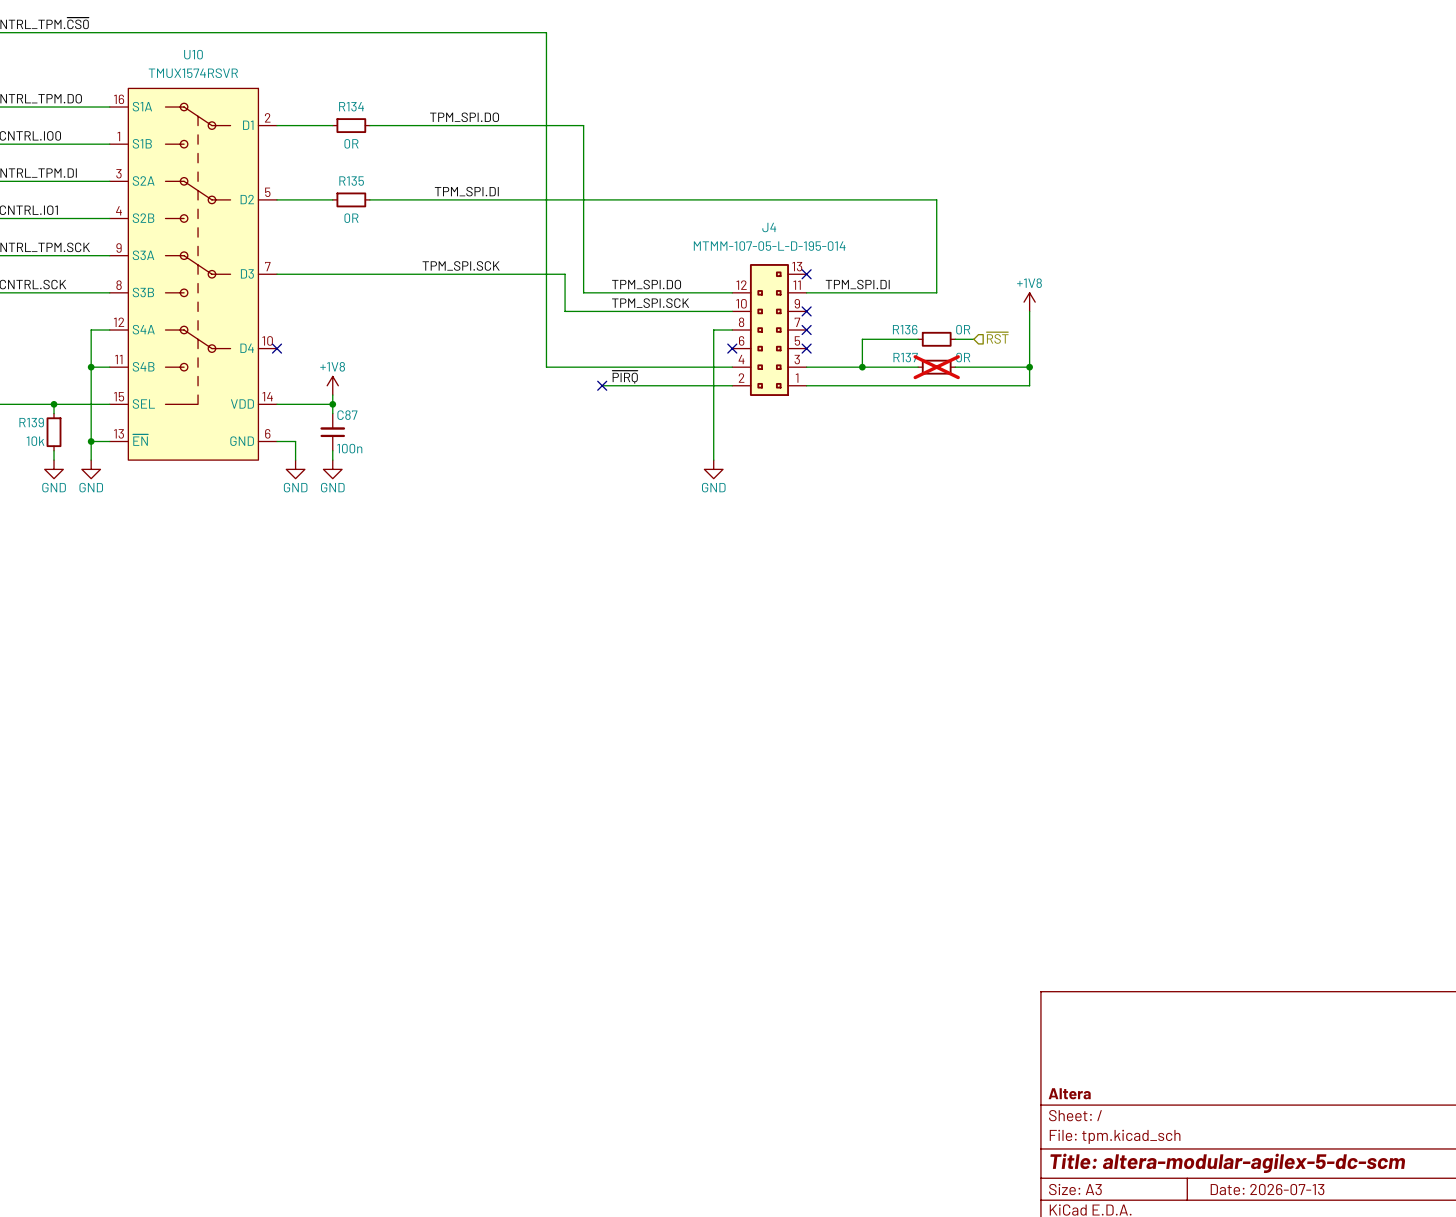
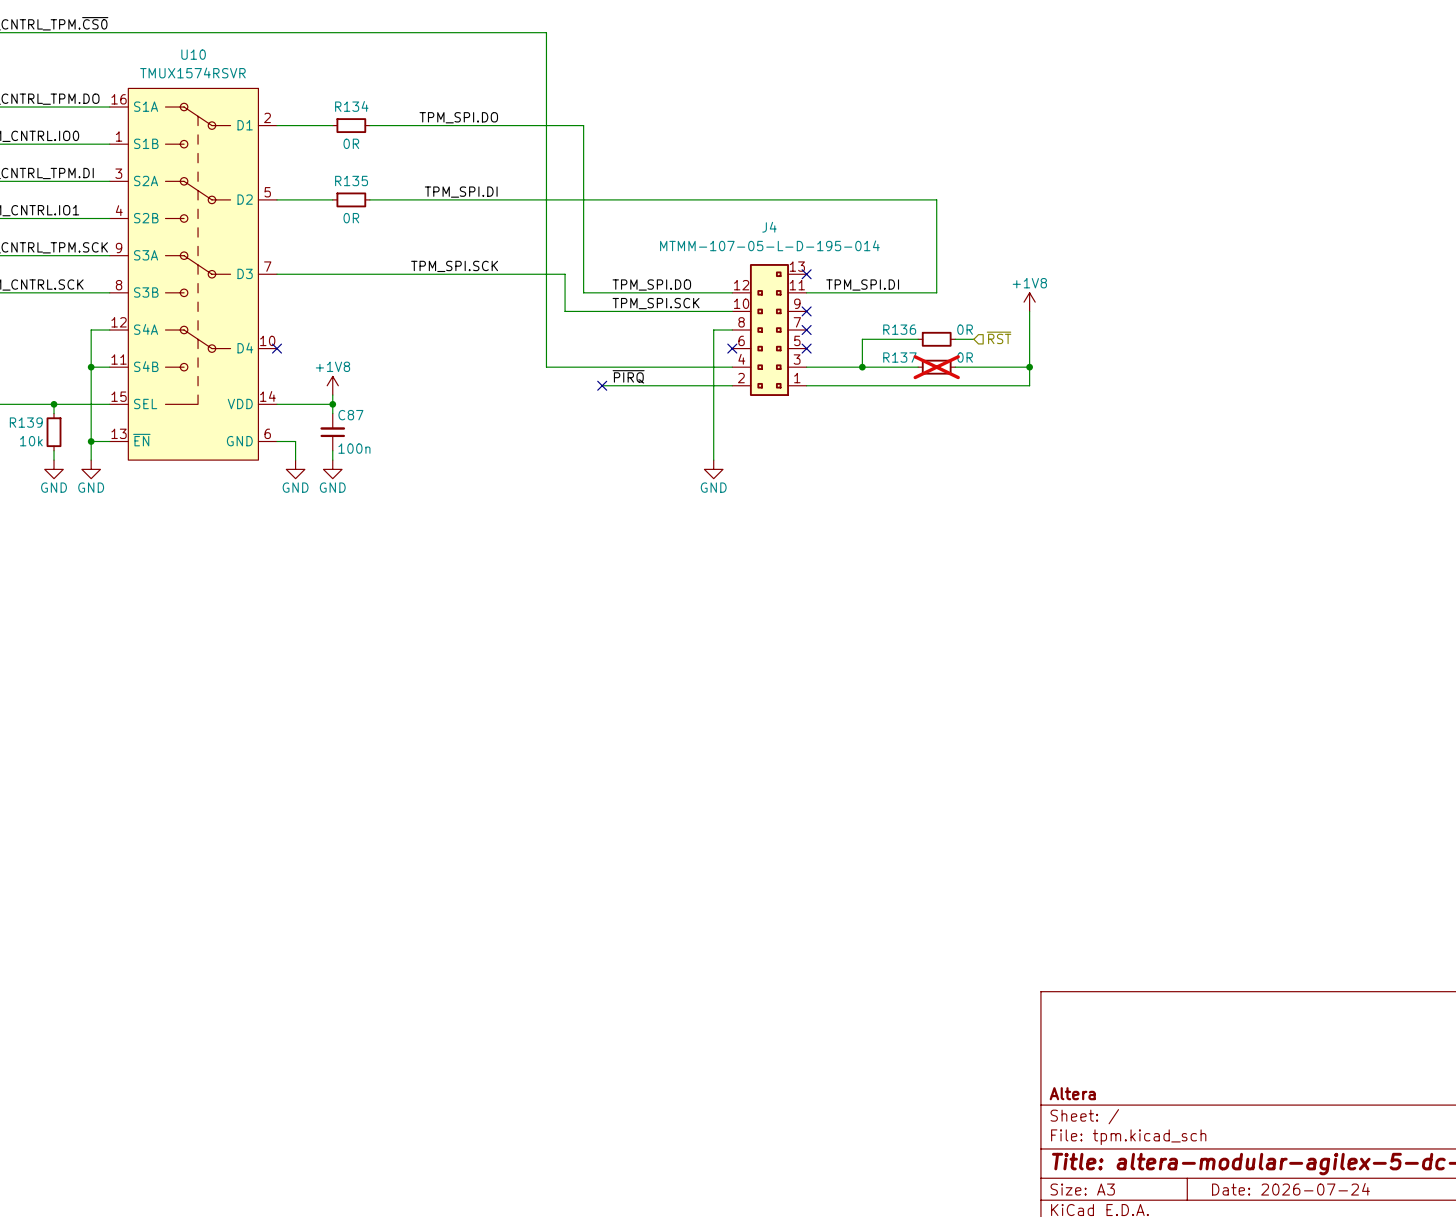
title block: Date: 2026-07-13 (1267, 1189) -> Date: 2026-07-24 (1290, 1189)

